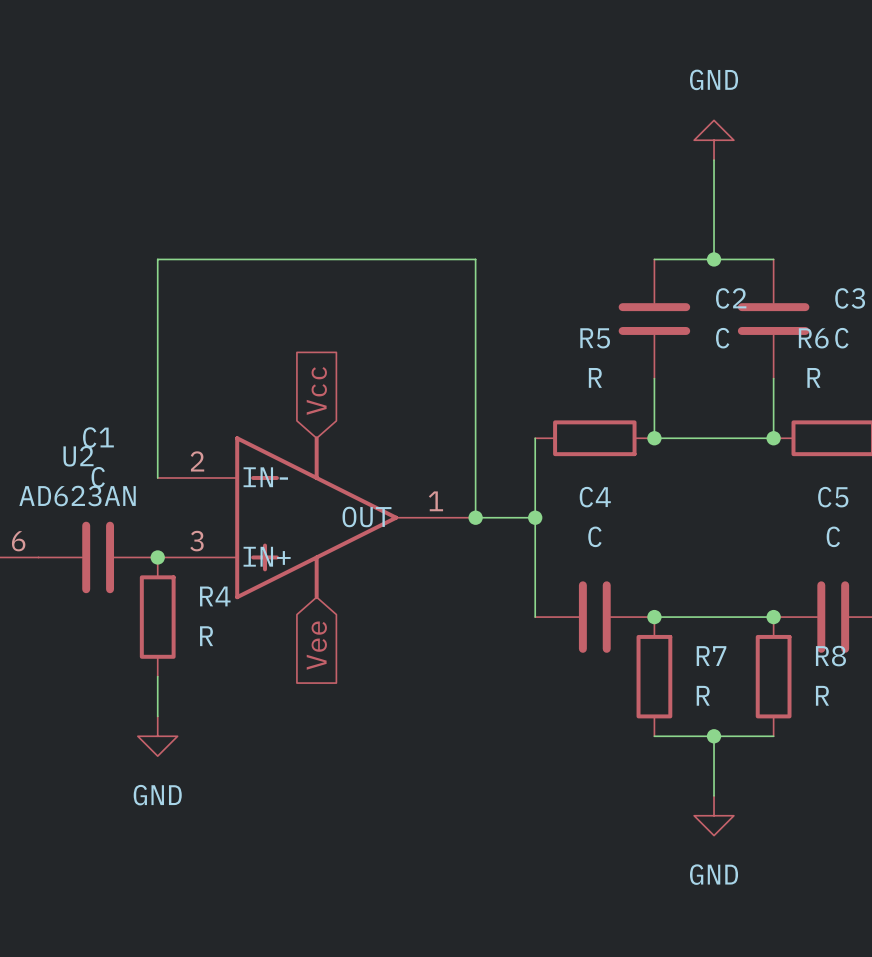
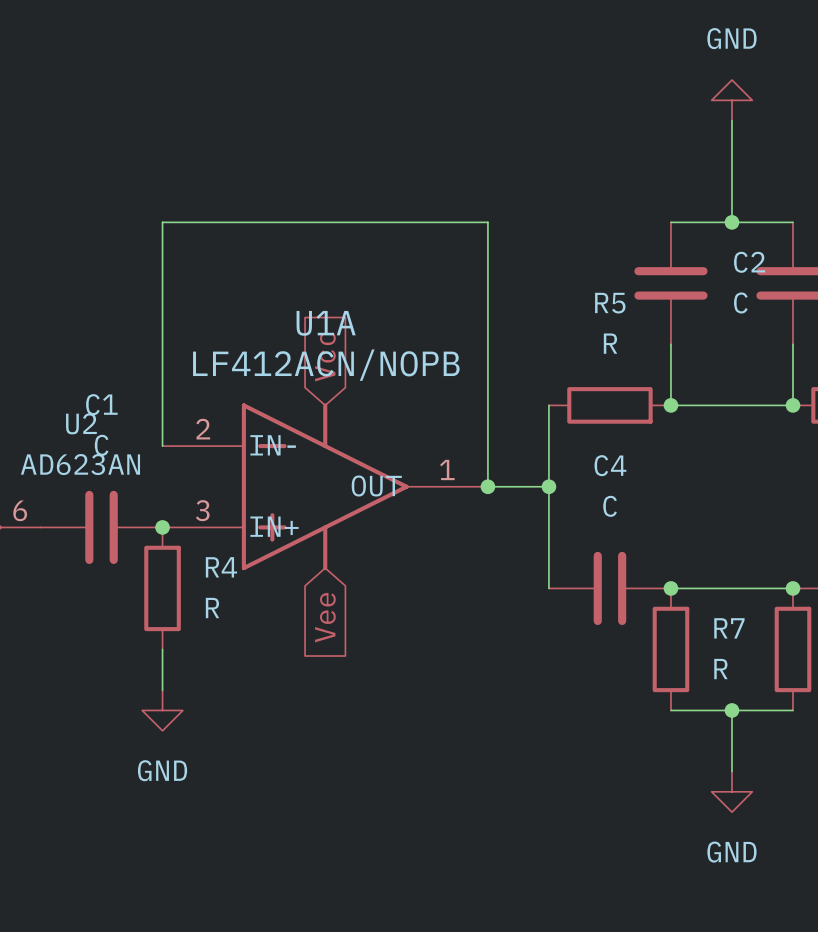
U1A name: none -> U1A (326, 323)
U1A value: none -> LF412ACN/NOPB (326, 365)

